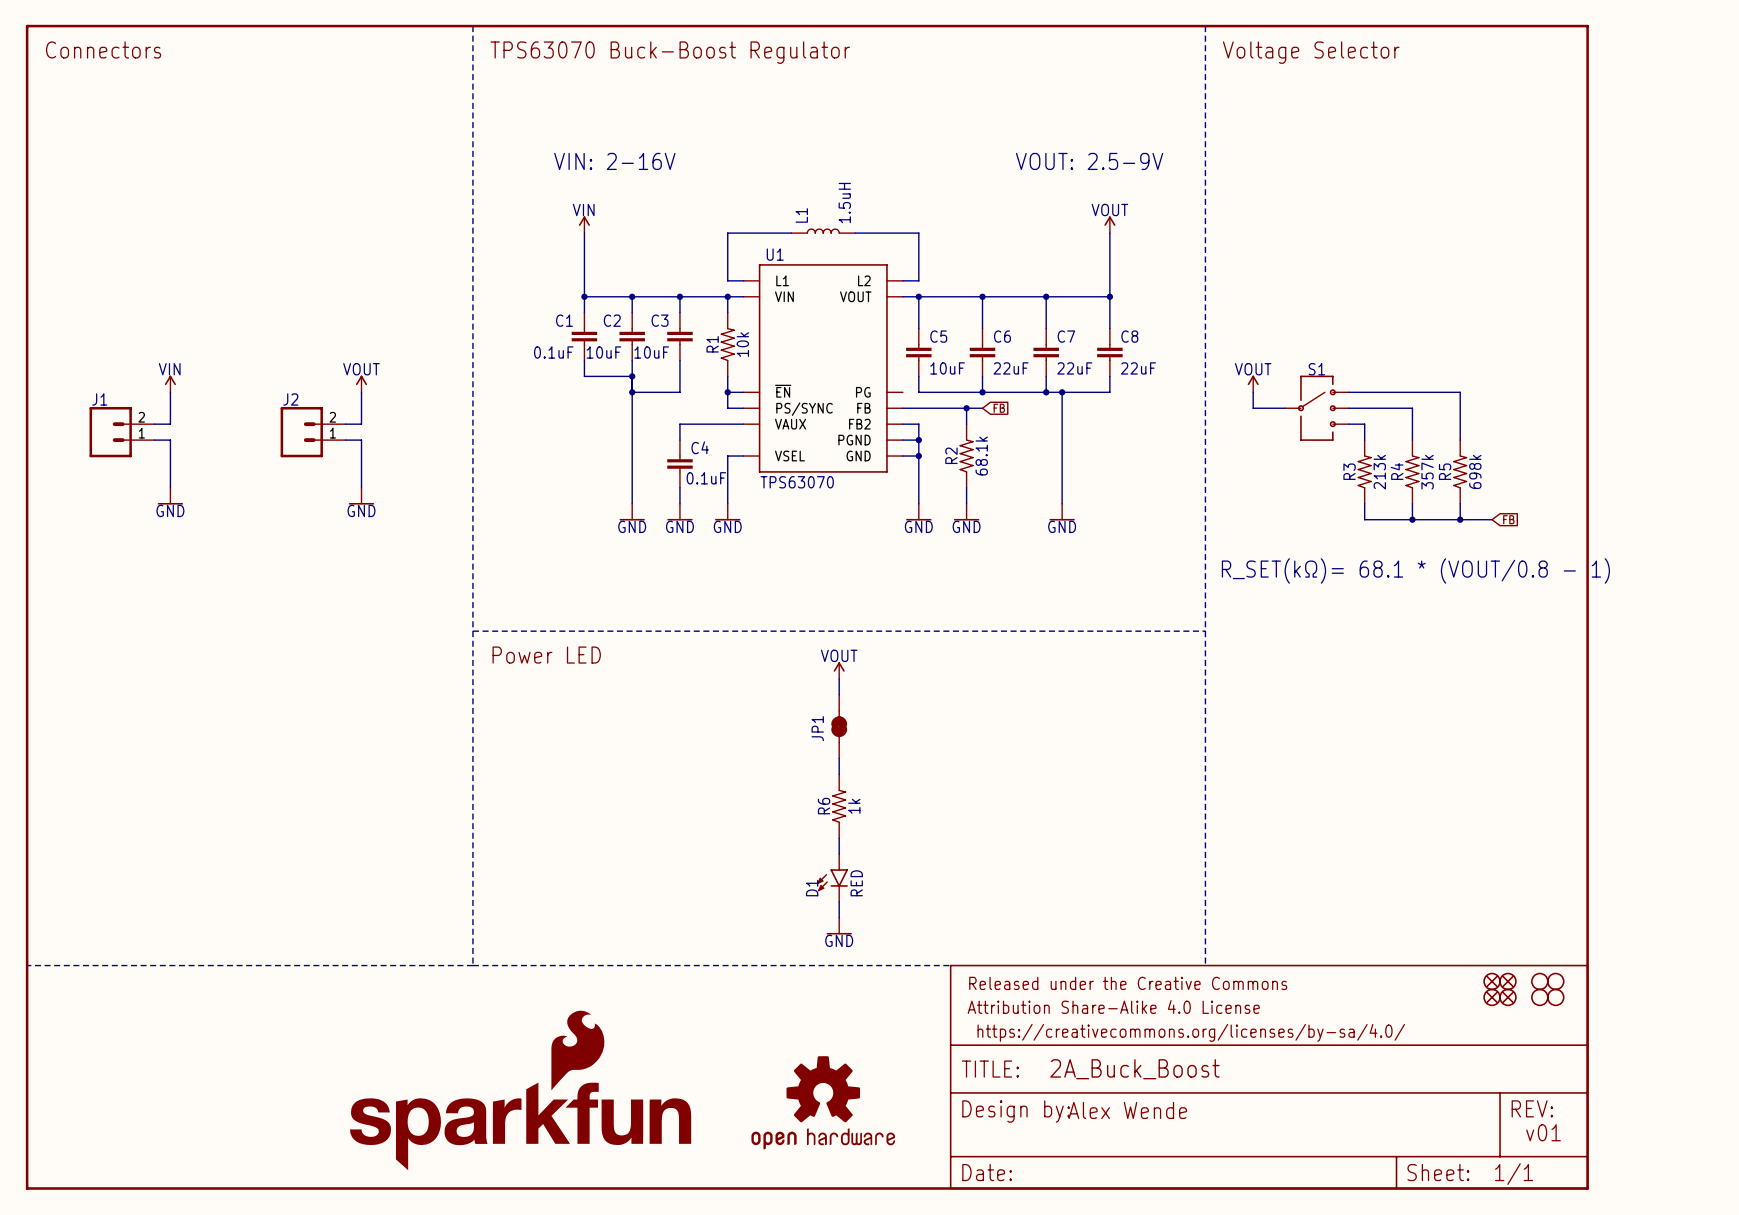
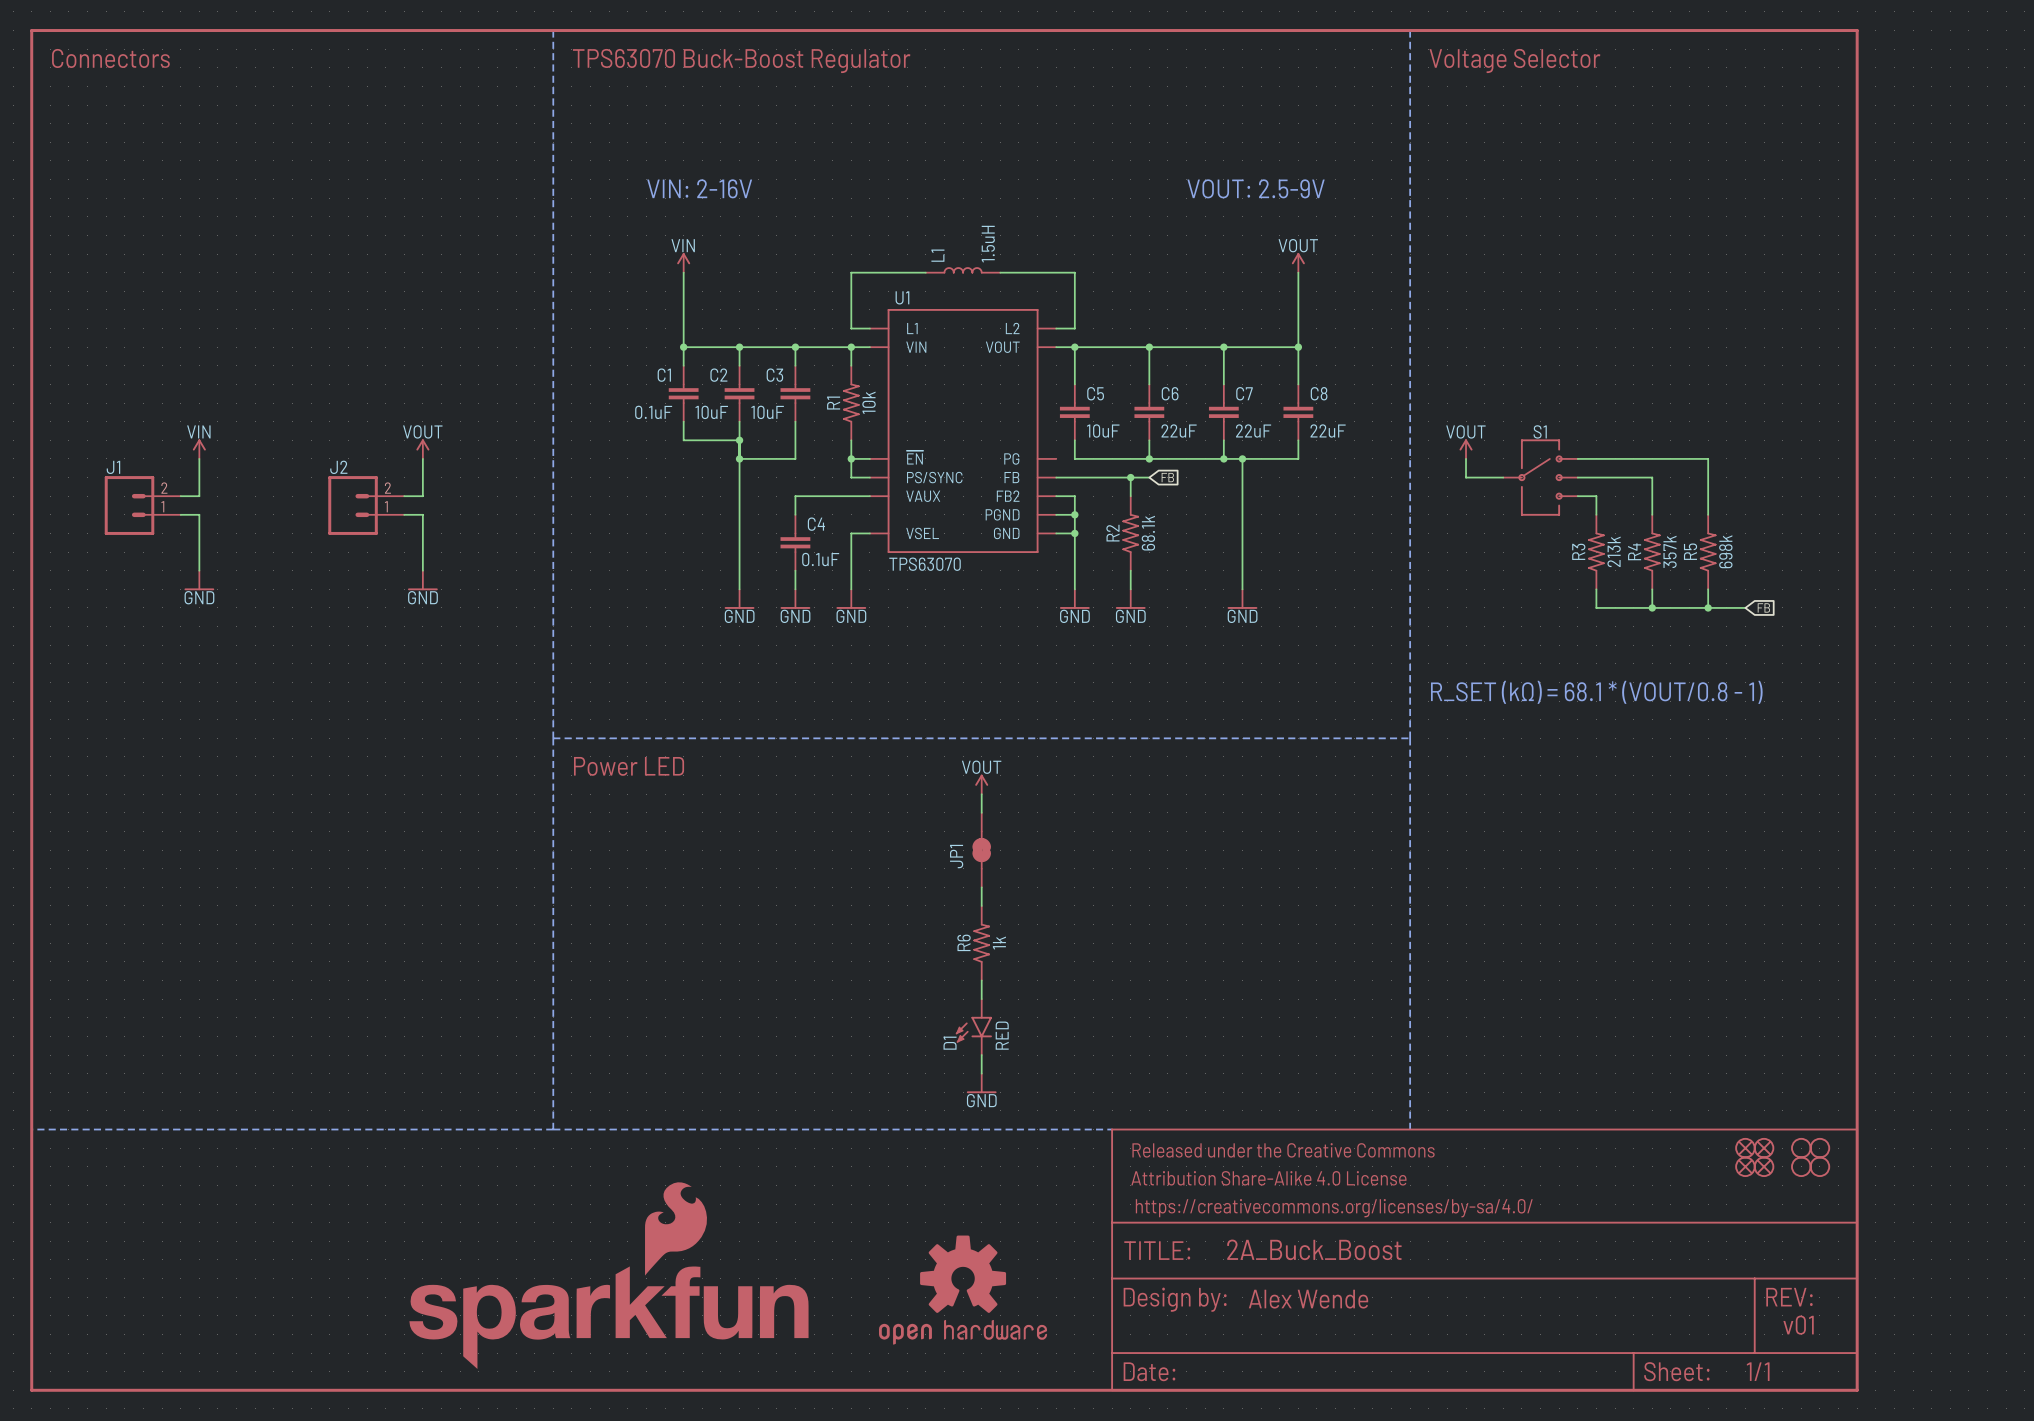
text: R_SET(kΩ)= 68.1 * (VOUT/0.8 - 1) (1415, 570) -> R_SET (kΩ) = 68.1 * (VOUT/0.8 - 1) (1596, 692)

